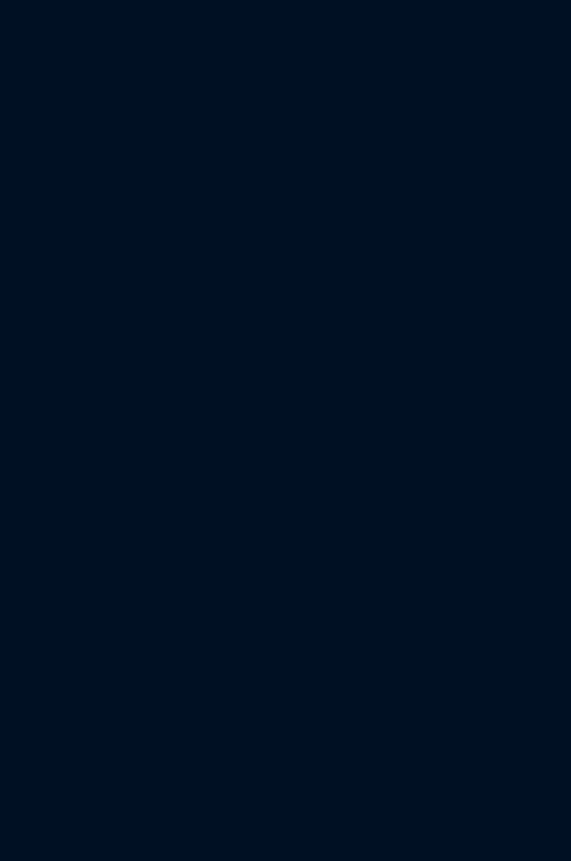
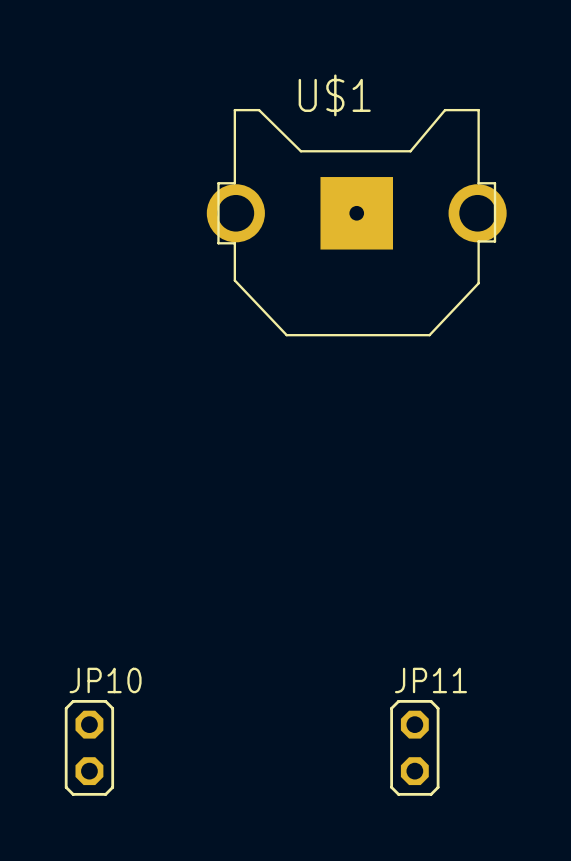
U$1: none -> (356, 222)
JP10: none -> (89, 747)
JP11: none -> (414, 747)

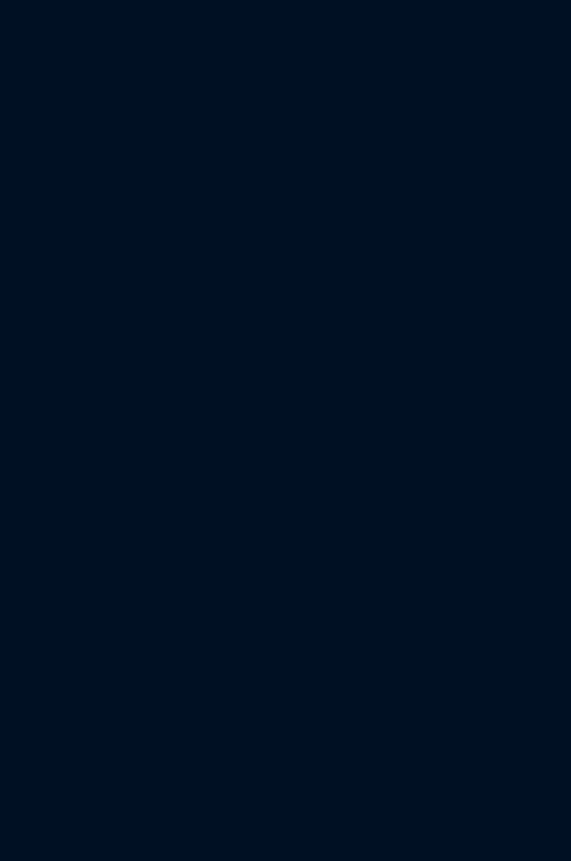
U$1: (356, 222) -> none
JP10: (89, 747) -> none
JP11: (414, 747) -> none

